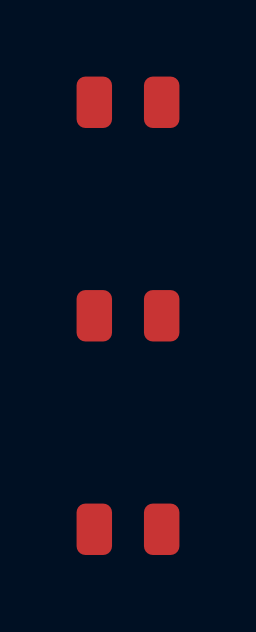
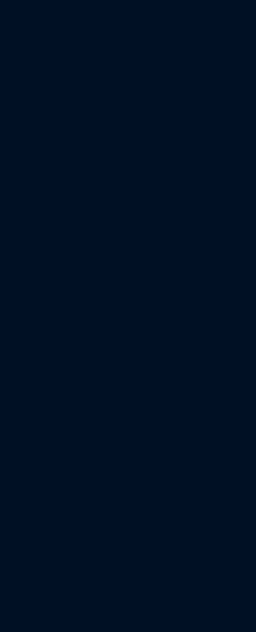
part: (127, 102) -> none
part: (127, 315) -> none
part: (127, 529) -> none

